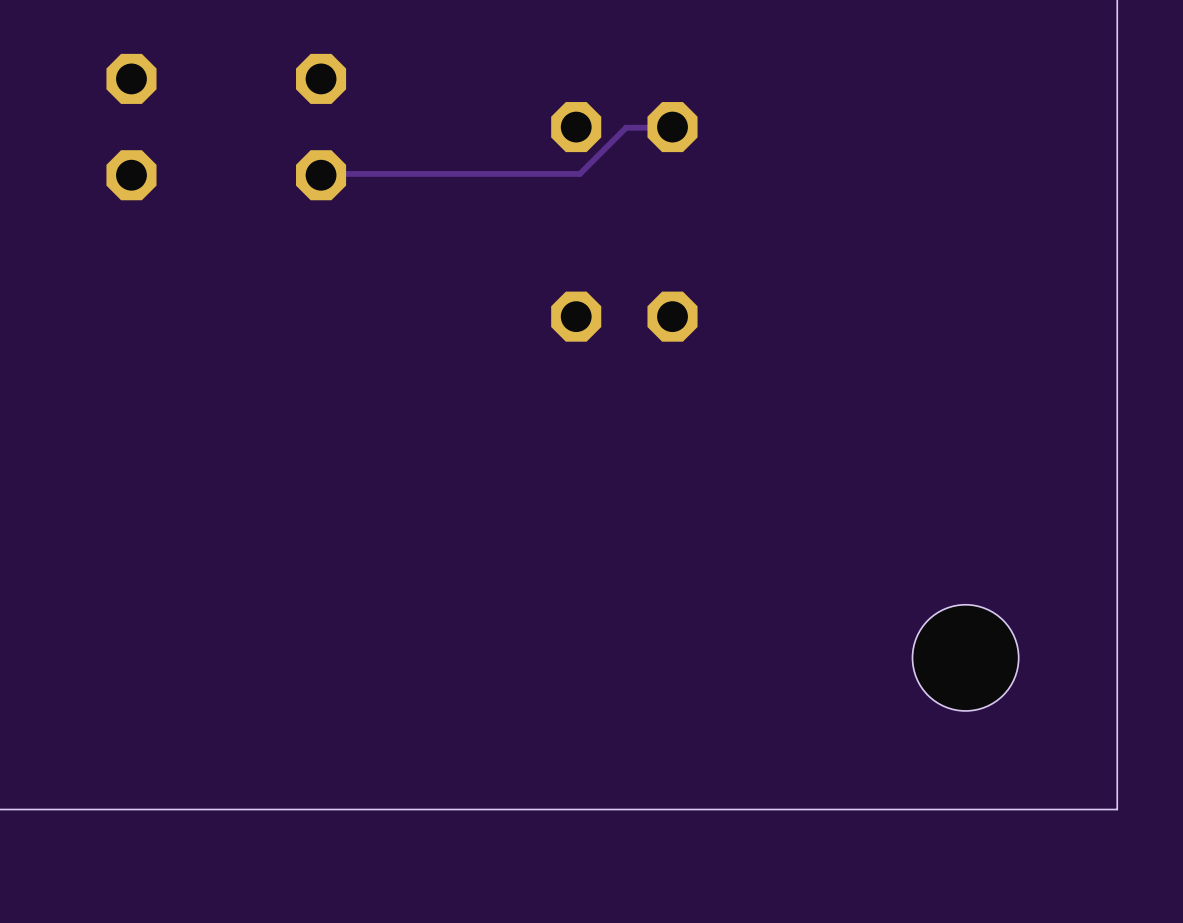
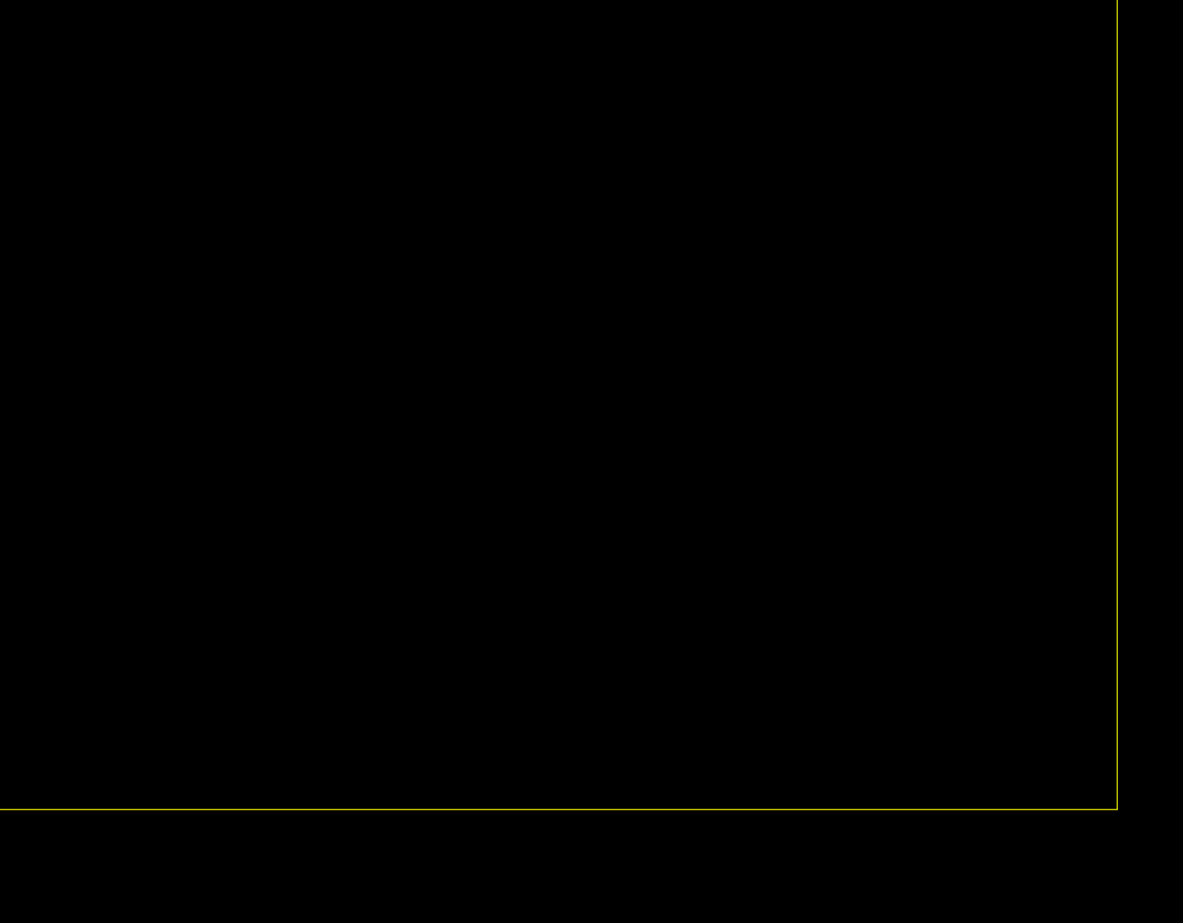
part: (131, 127) -> none
part: (321, 127) -> none
part: (624, 127) -> none
track: (672, 127) (626, 127) (579, 173) (321, 175) -> none
part: (624, 316) -> none
part: (965, 657) -> none

